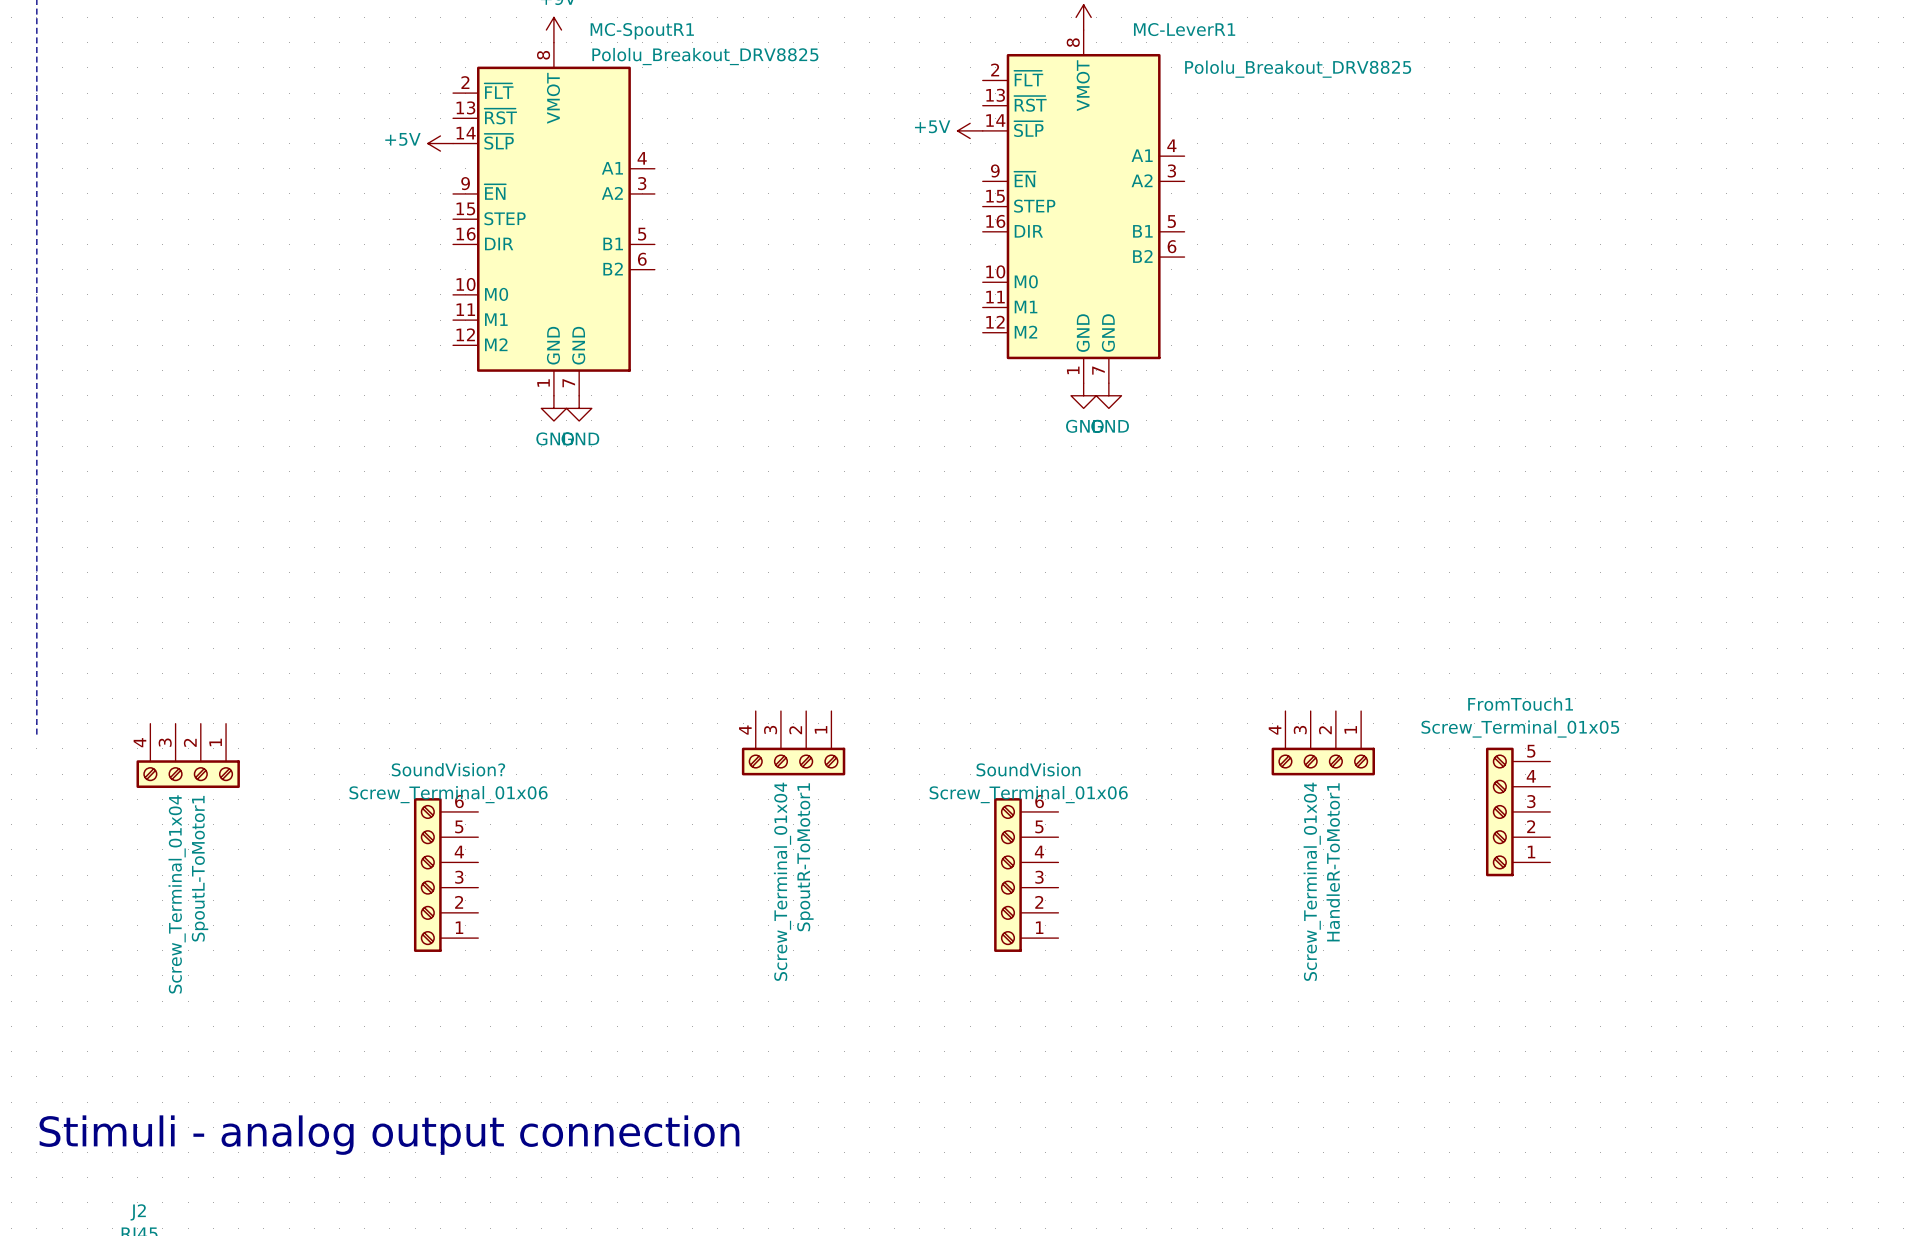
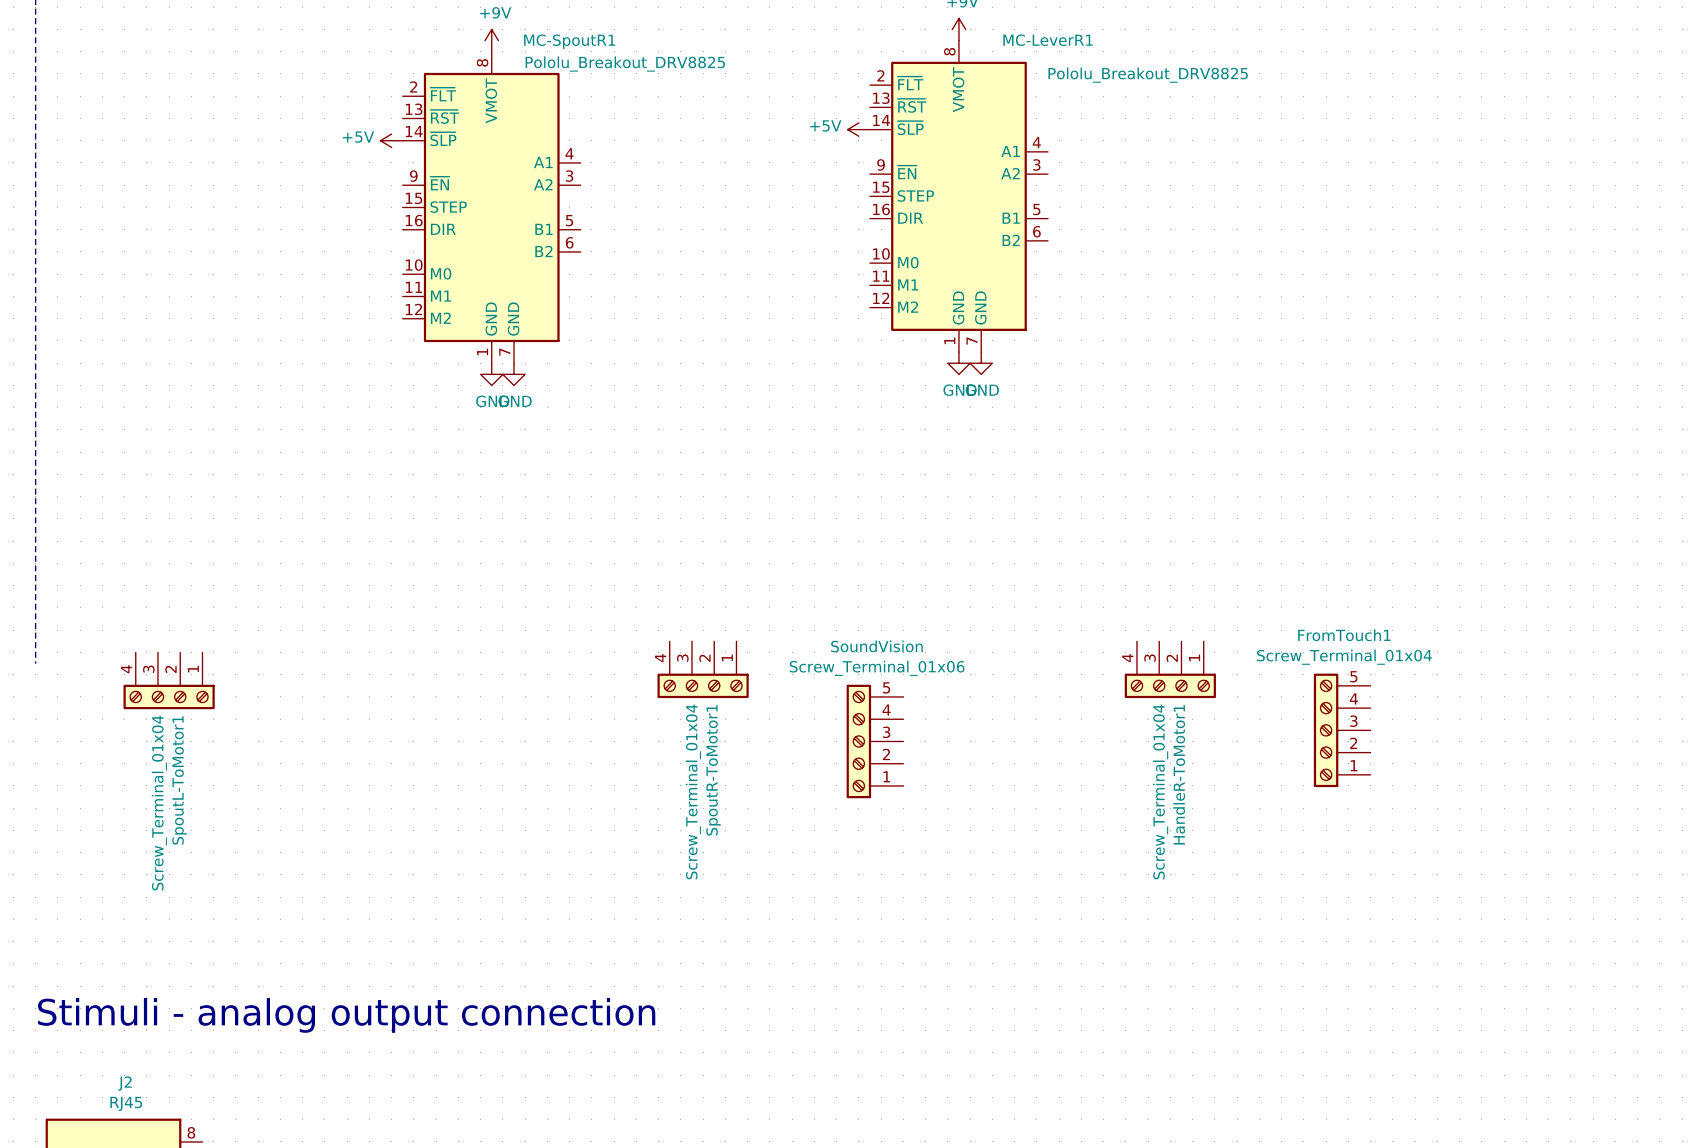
FromTouch1 value: Screw_Terminal_01x05 (1520, 729) -> Screw_Terminal_01x04 (1344, 657)
SoundVision: none -> Screw_Terminal_01x06 (874, 741)
SoundVision?: Screw_Terminal_01x06 (446, 875) -> none
SoundVision: Screw_Terminal_01x06 (1026, 875) -> none

